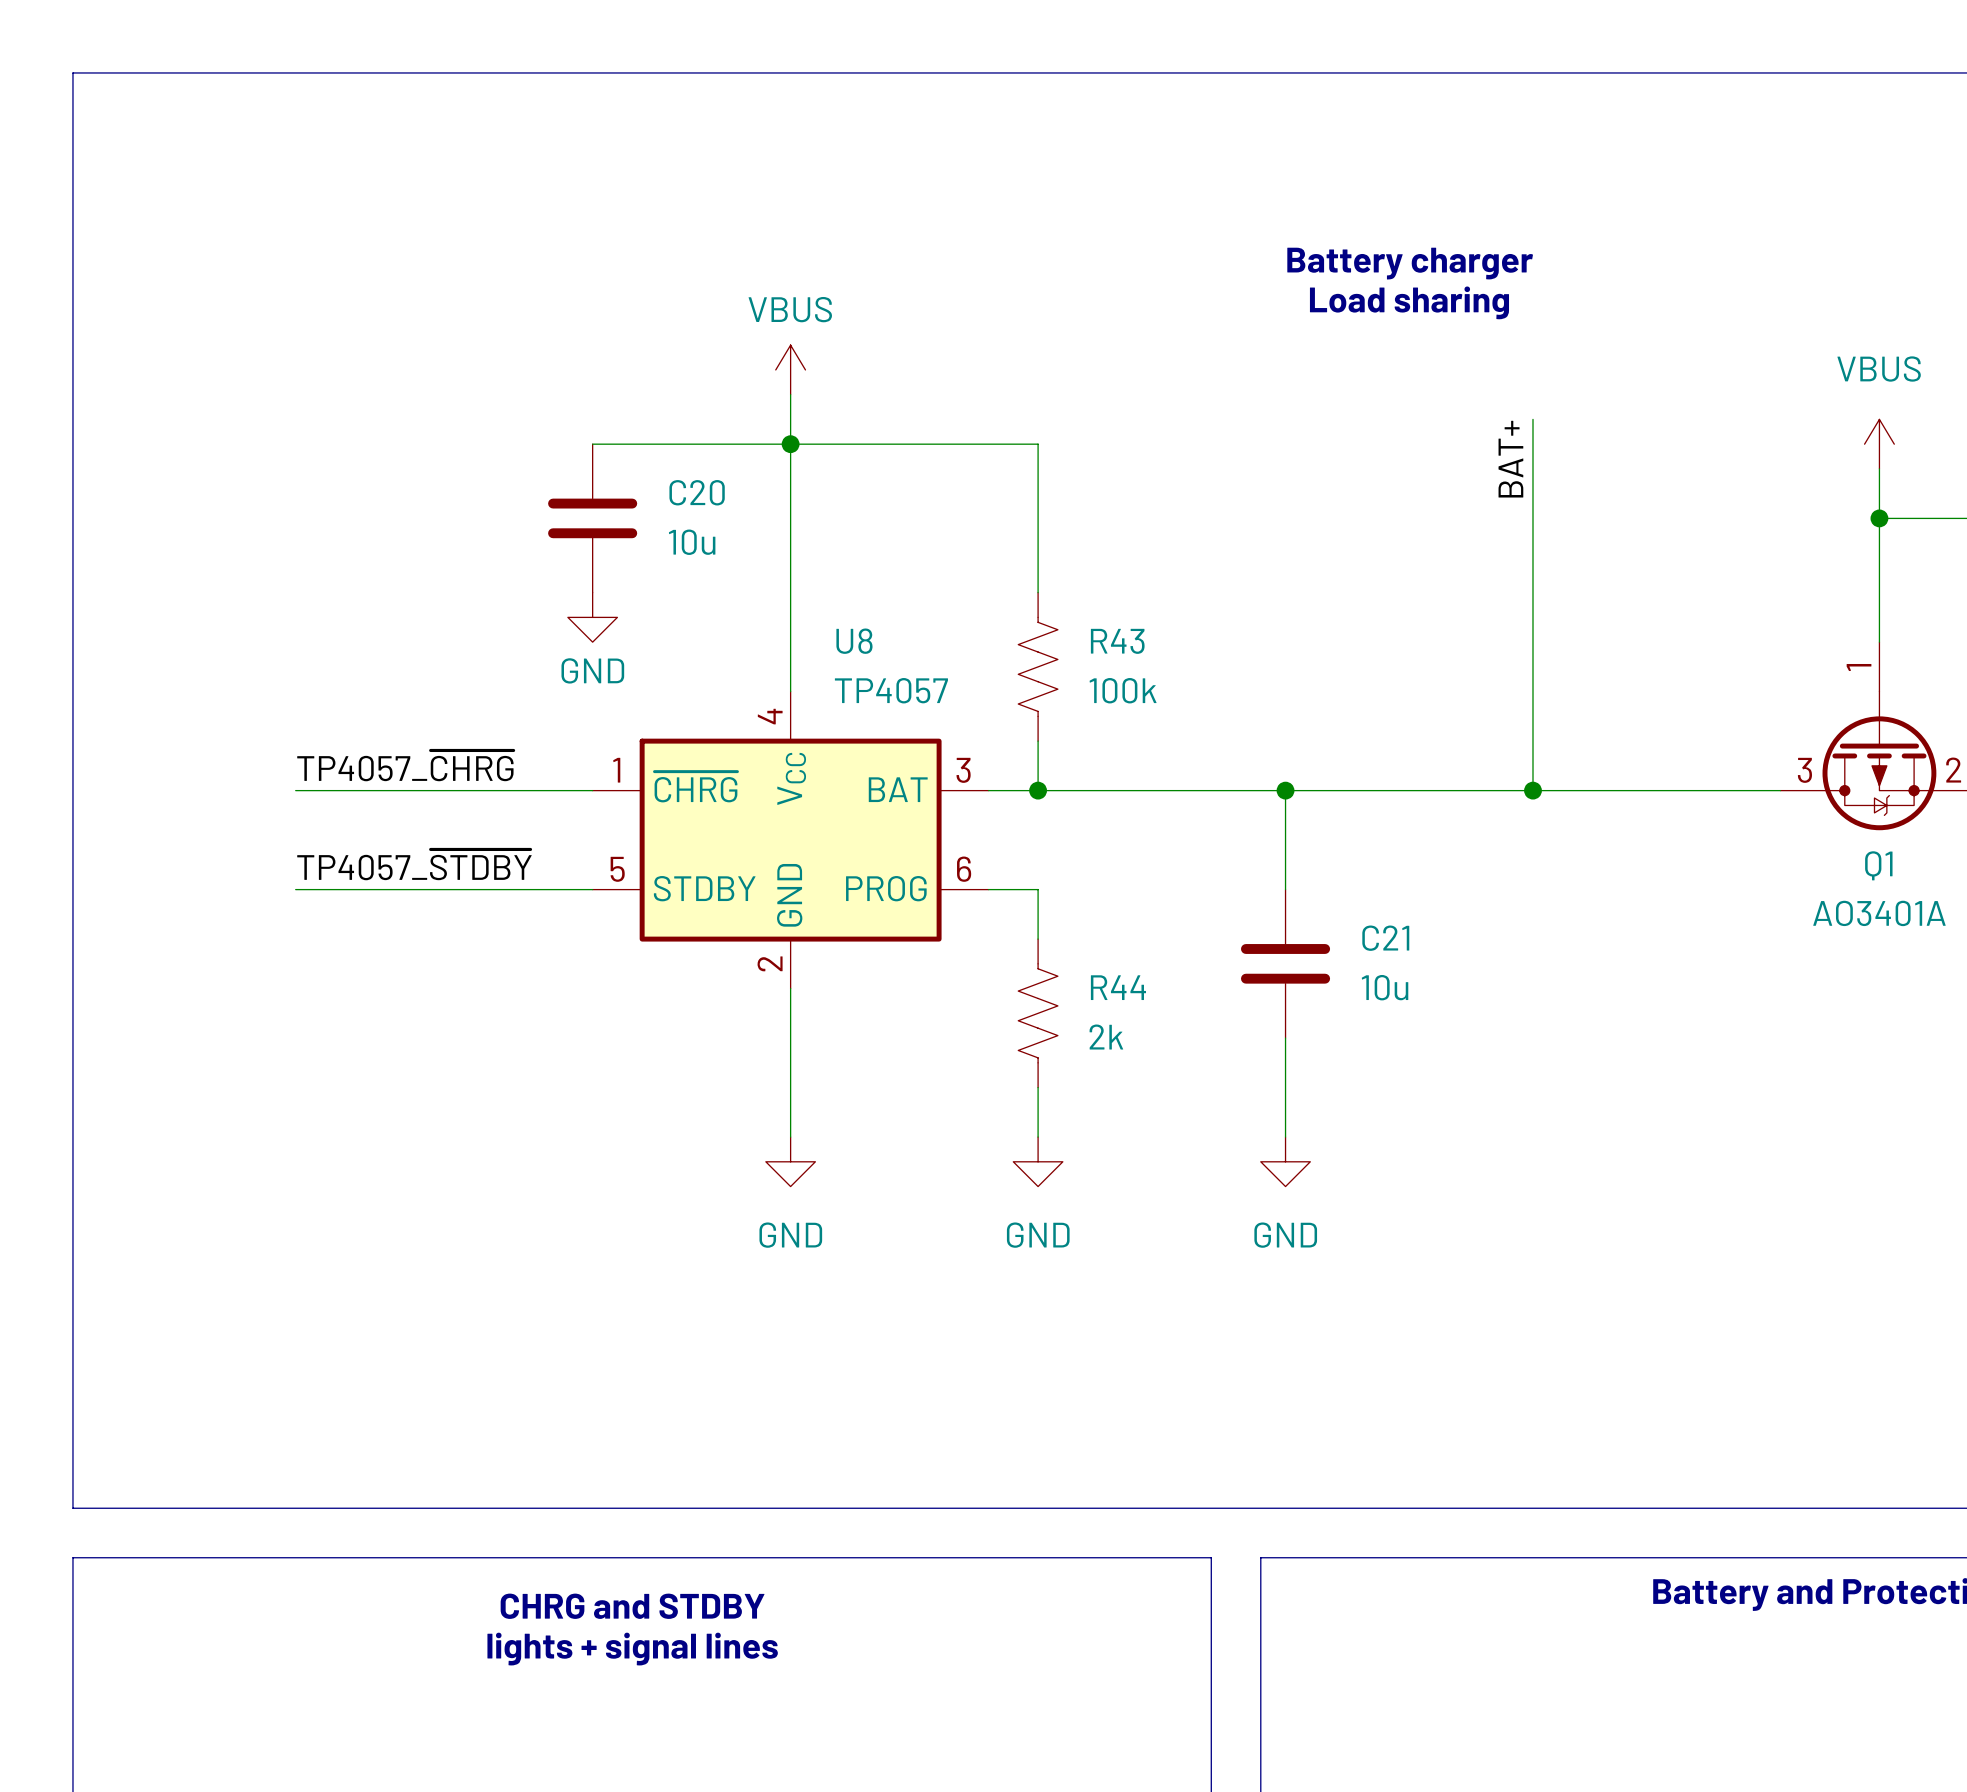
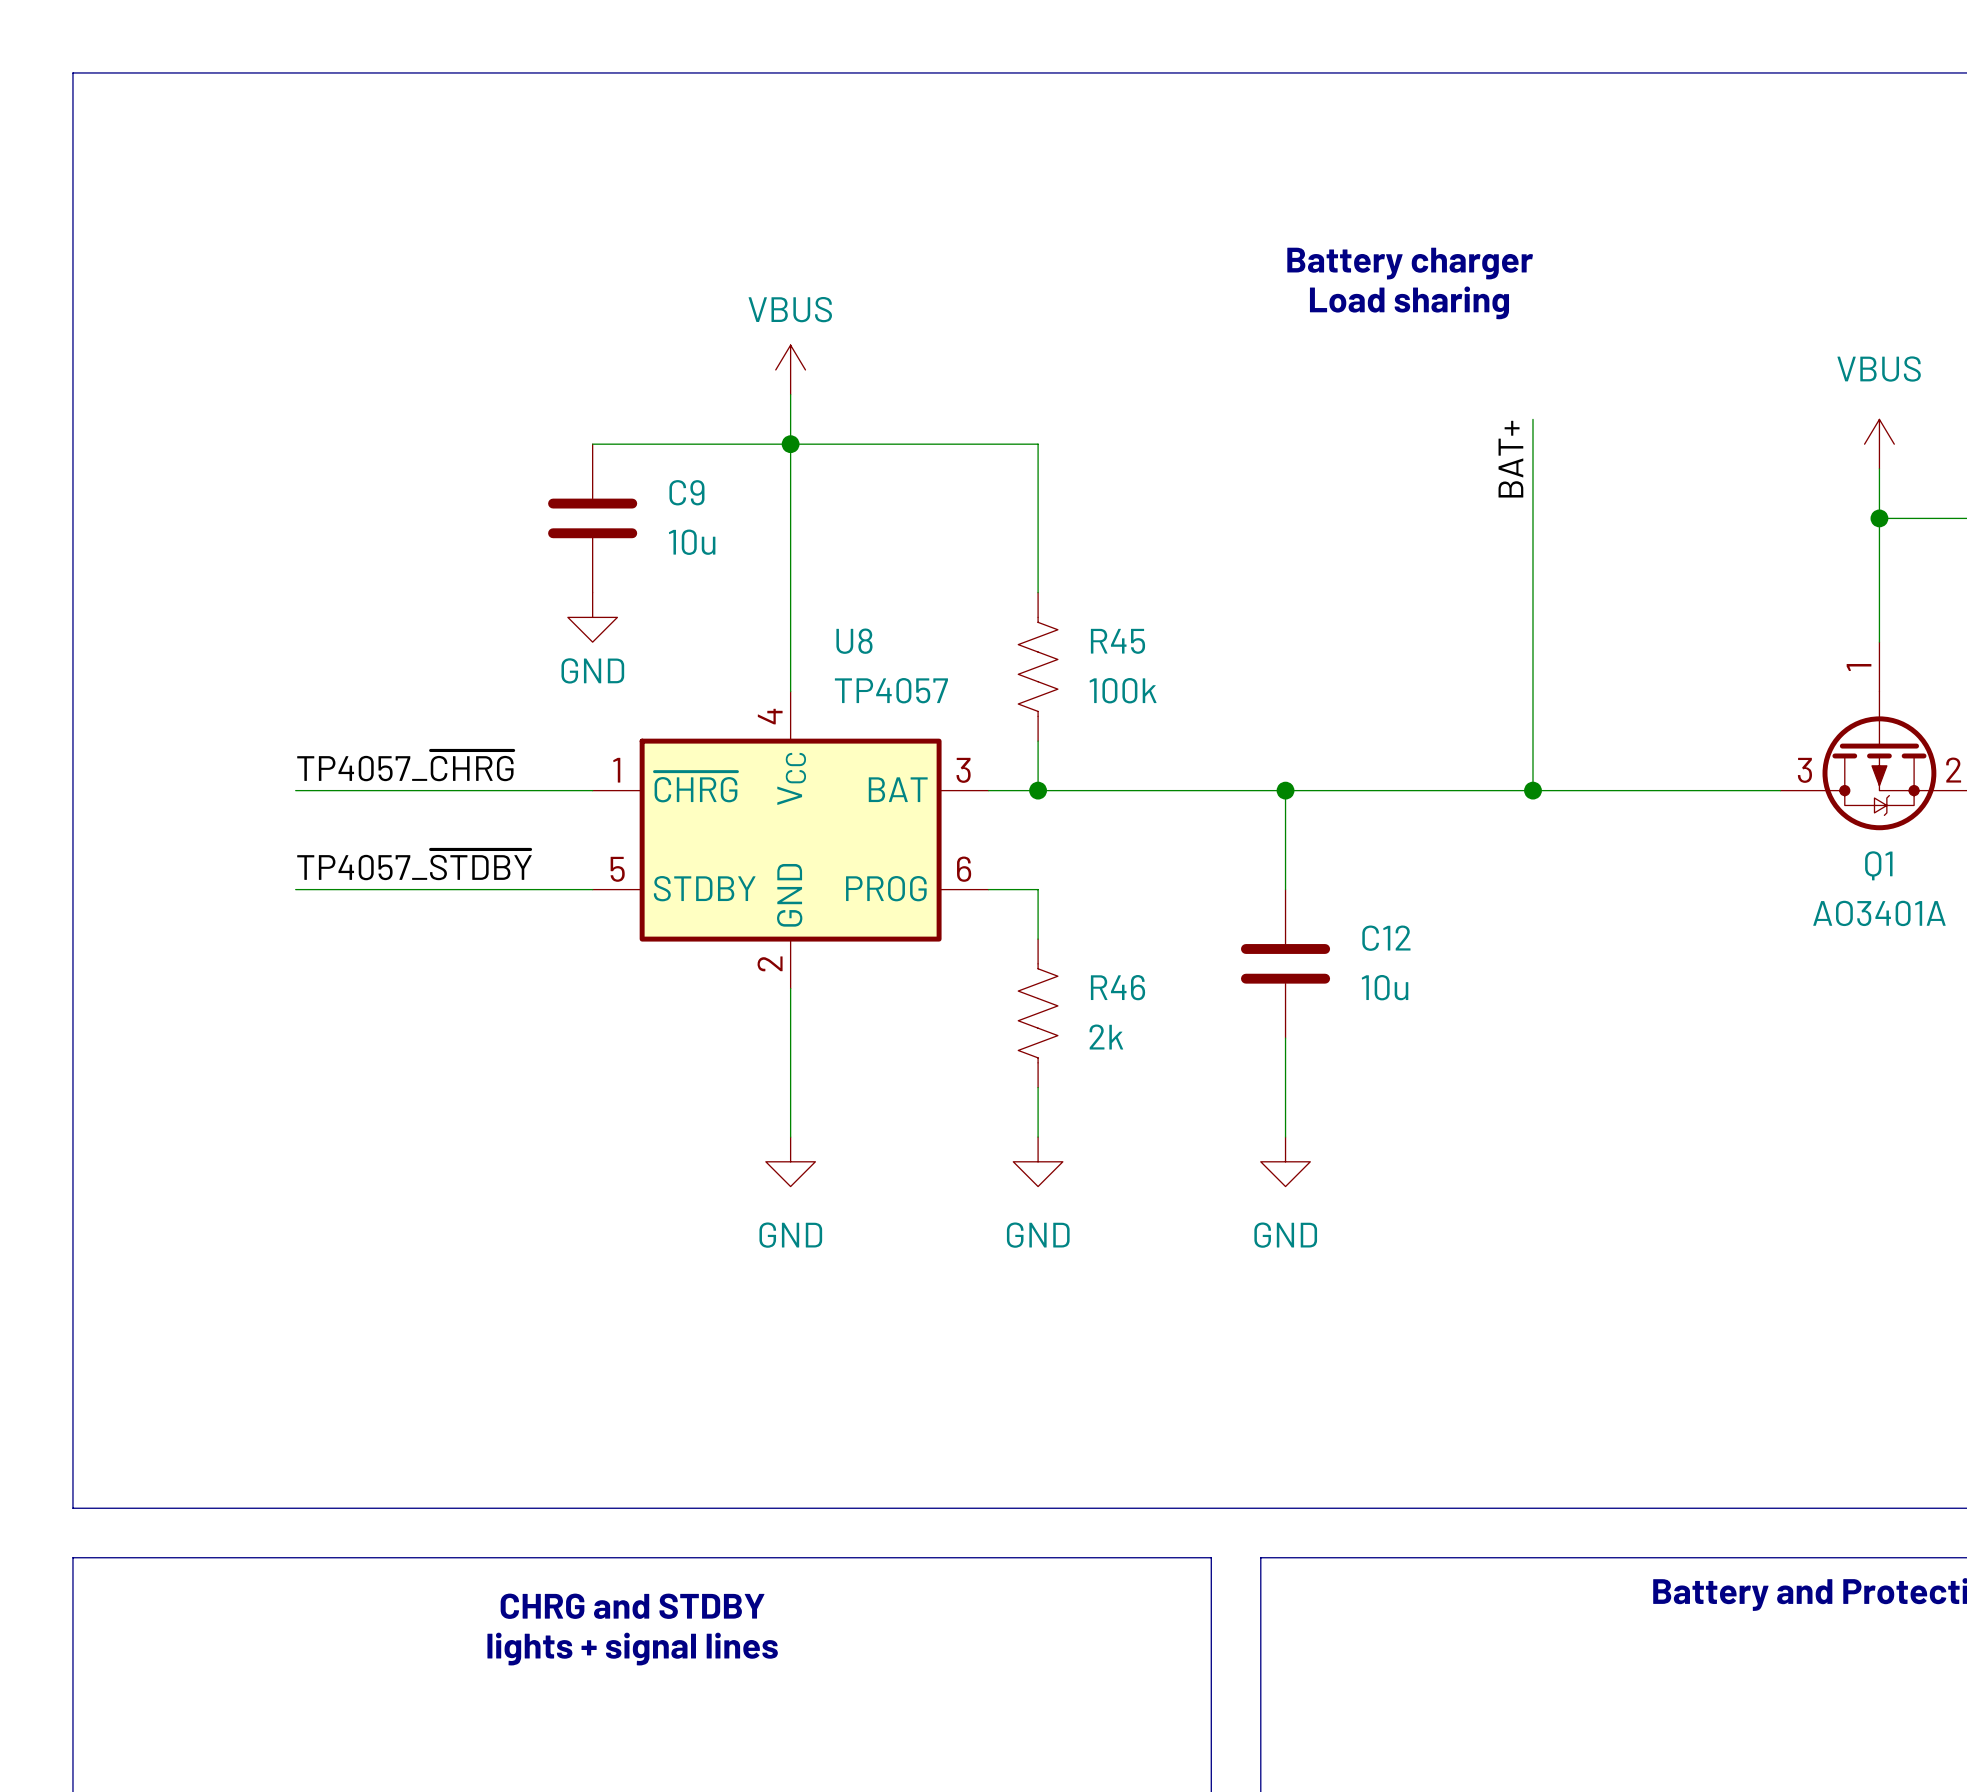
C20 name: C20 (697, 492) -> C9 (686, 492)
R43 name: R43 (1117, 641) -> R45 (1117, 641)
C21 name: C21 (1385, 938) -> C12 (1386, 938)
R44 name: R44 (1118, 987) -> R46 (1118, 987)

